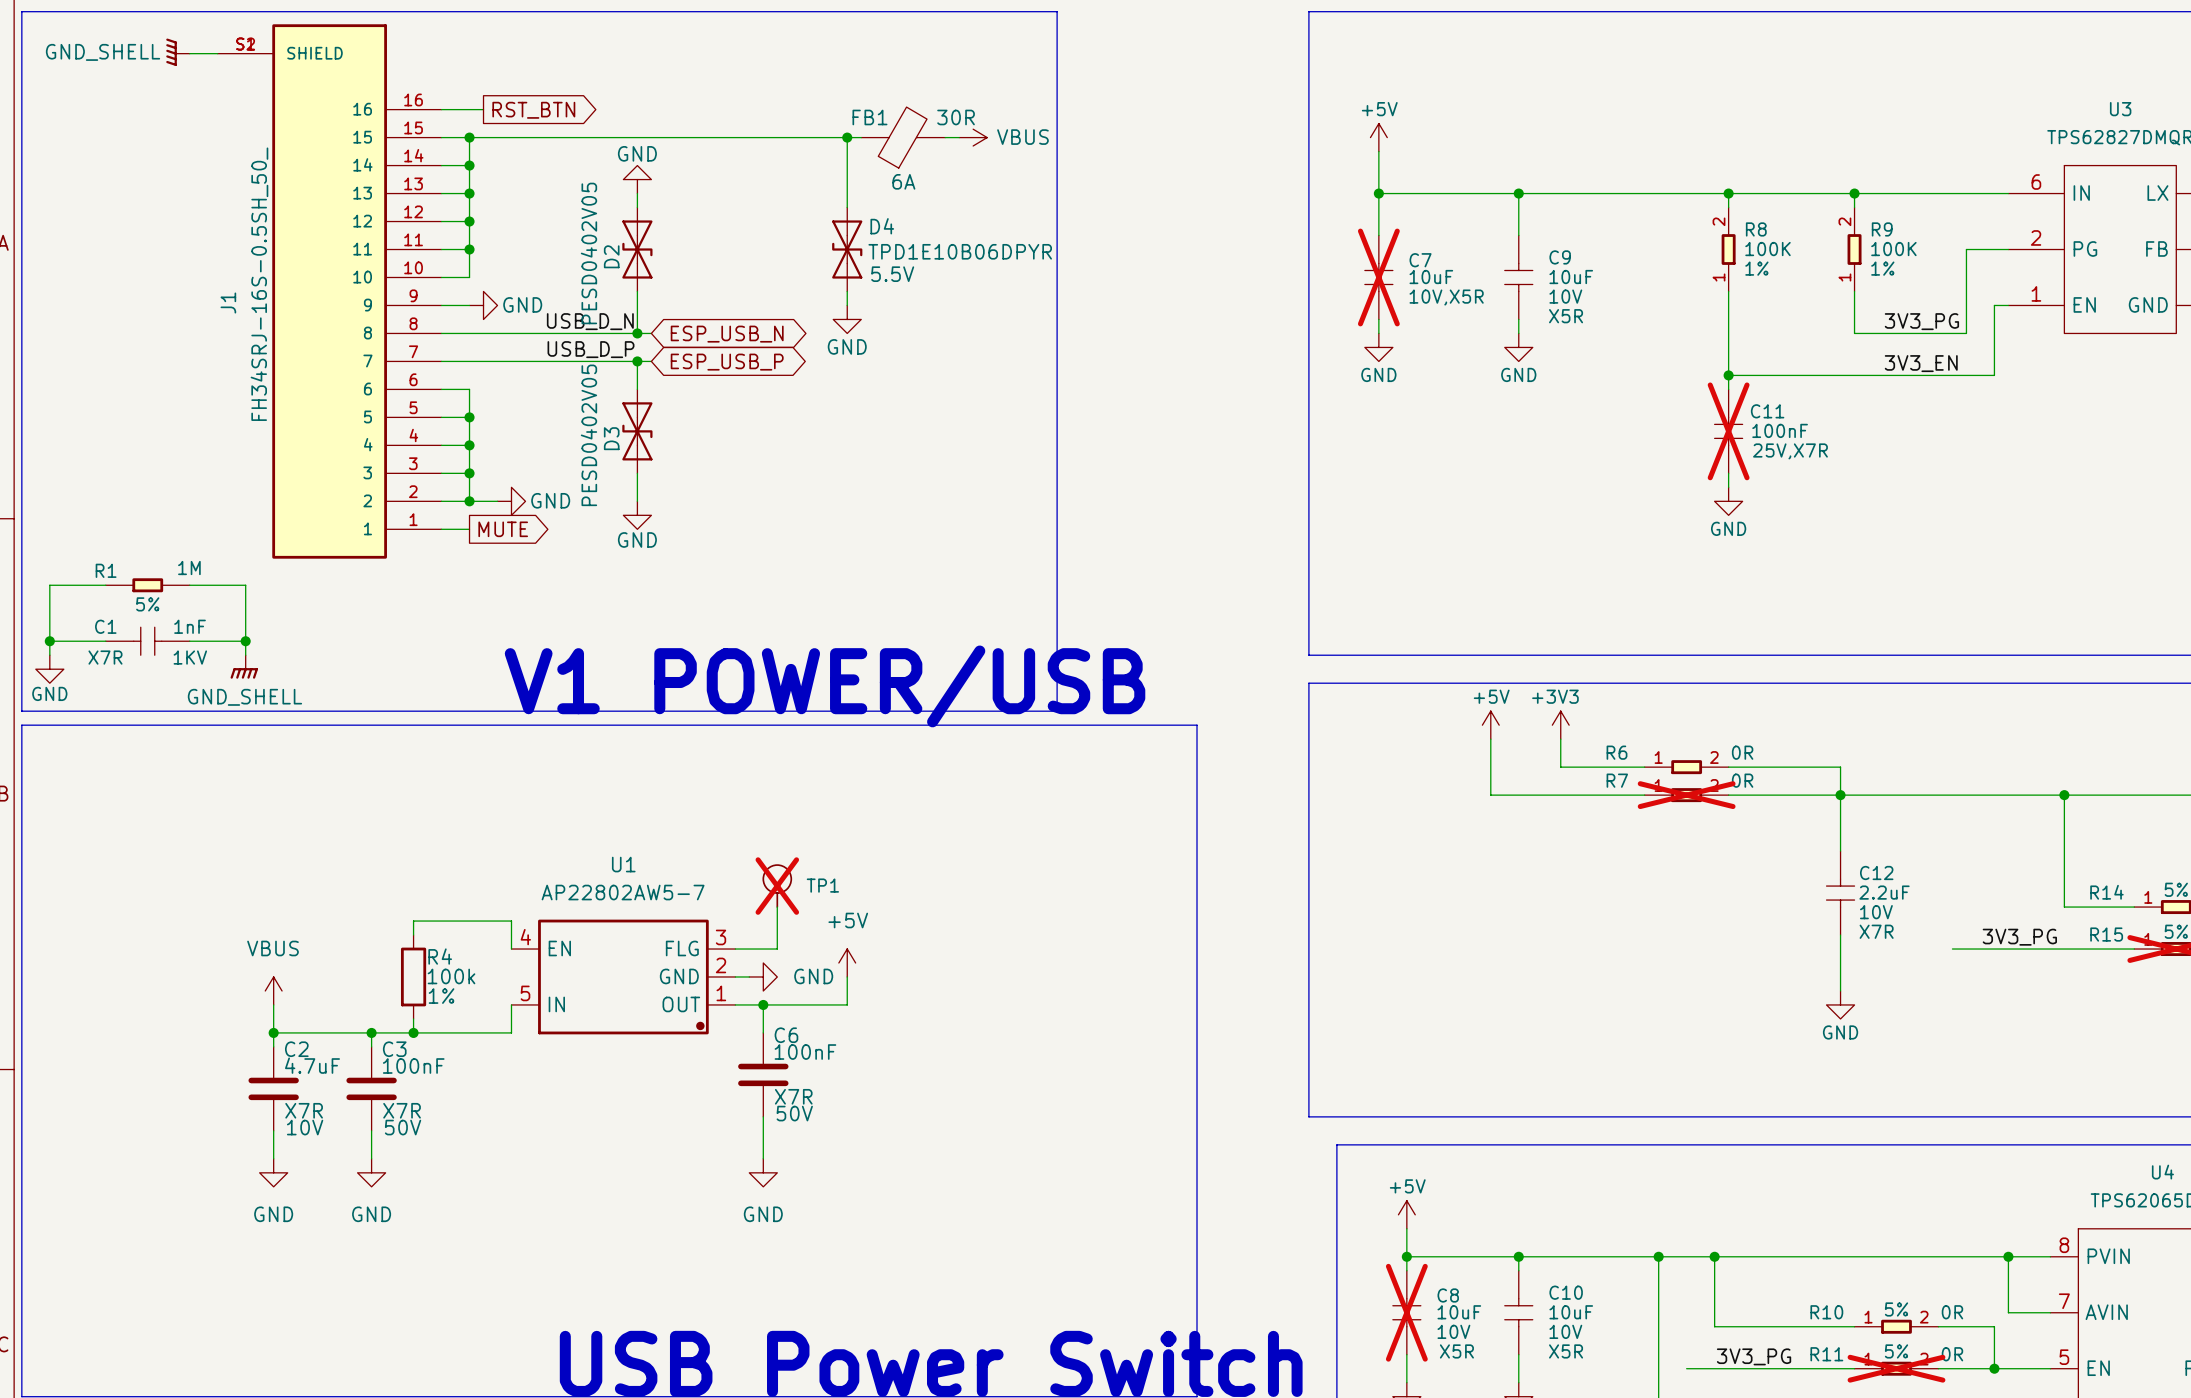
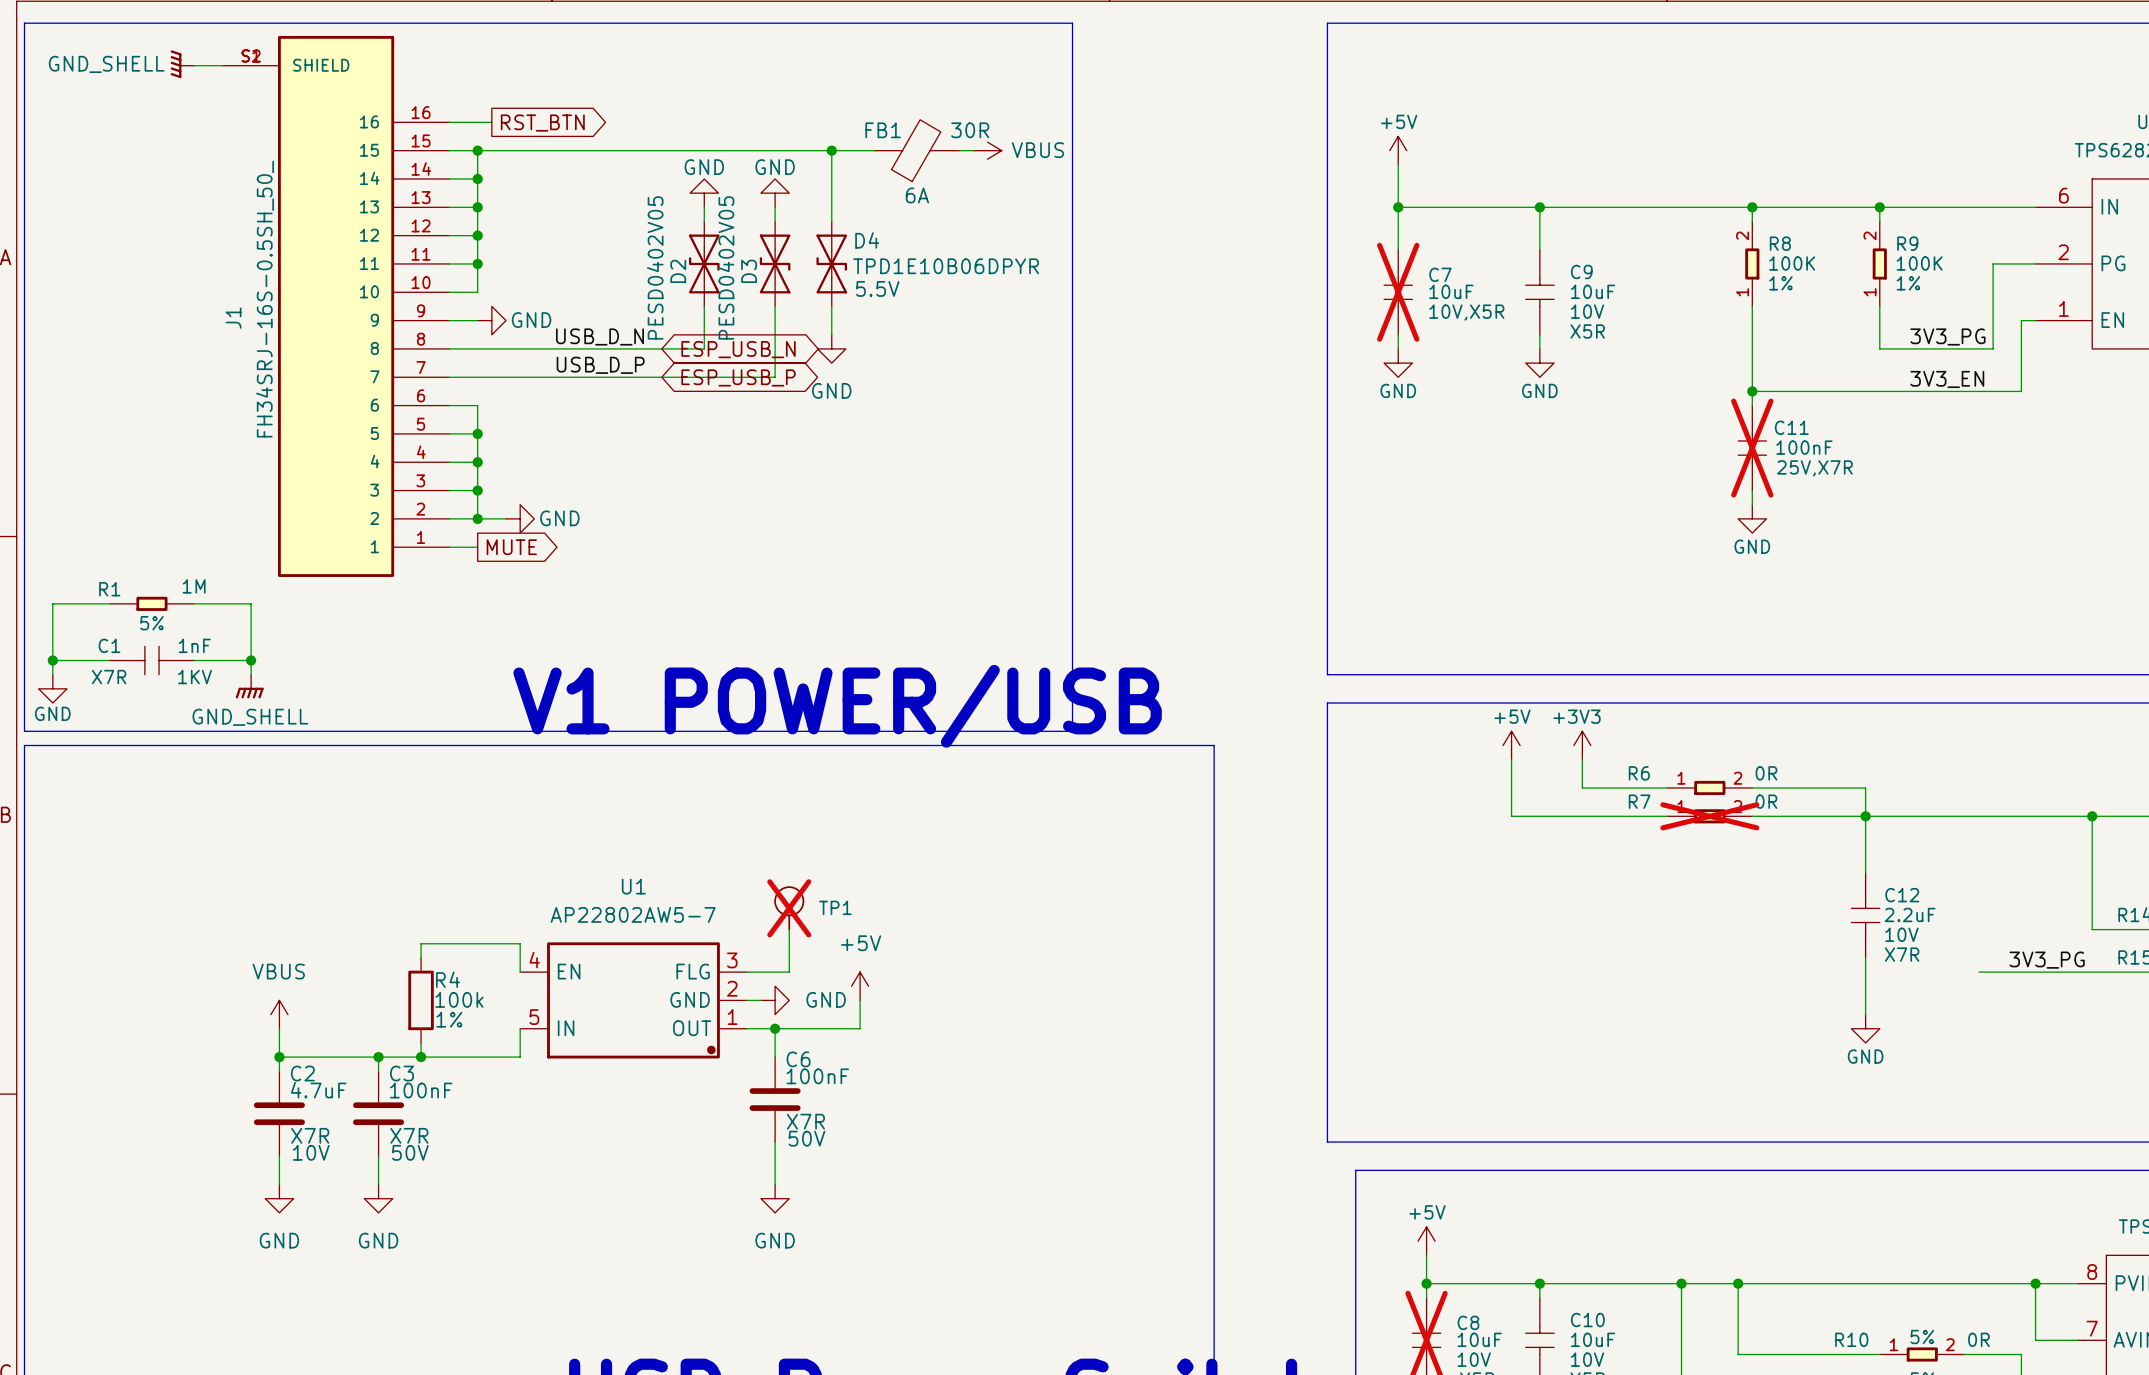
wire: (847, 137) (847, 207) -> (831, 150) (831, 221)
junction position: (847, 137) -> (831, 150)
power symbol position: GND (637, 179) -> GND (704, 193)
power symbol: none -> GND (775, 193)
wire: (637, 193) (637, 207) -> (704, 207) (704, 221)
D2 position: (637, 249) -> (704, 263)
D4 position: (847, 249) -> (831, 263)
wire: (637, 291) (637, 333) -> none
wire: none -> (704, 306) (704, 348) (661, 348)
wire: none -> (775, 306) (775, 377) (661, 377)
wire: (847, 291) (847, 305) -> (775, 207) (775, 221)
power symbol position: GND (847, 319) -> GND (831, 348)
junction: (637, 333) -> none
power symbol text position: GND (847, 346) -> GND (831, 390)
wire: (637, 361) (637, 389) -> (831, 306) (831, 334)
junction: (637, 361) -> none
D3 position: (637, 431) -> (775, 263)
wire: (637, 473) (637, 501) -> none
power symbol: GND (637, 515) -> none

